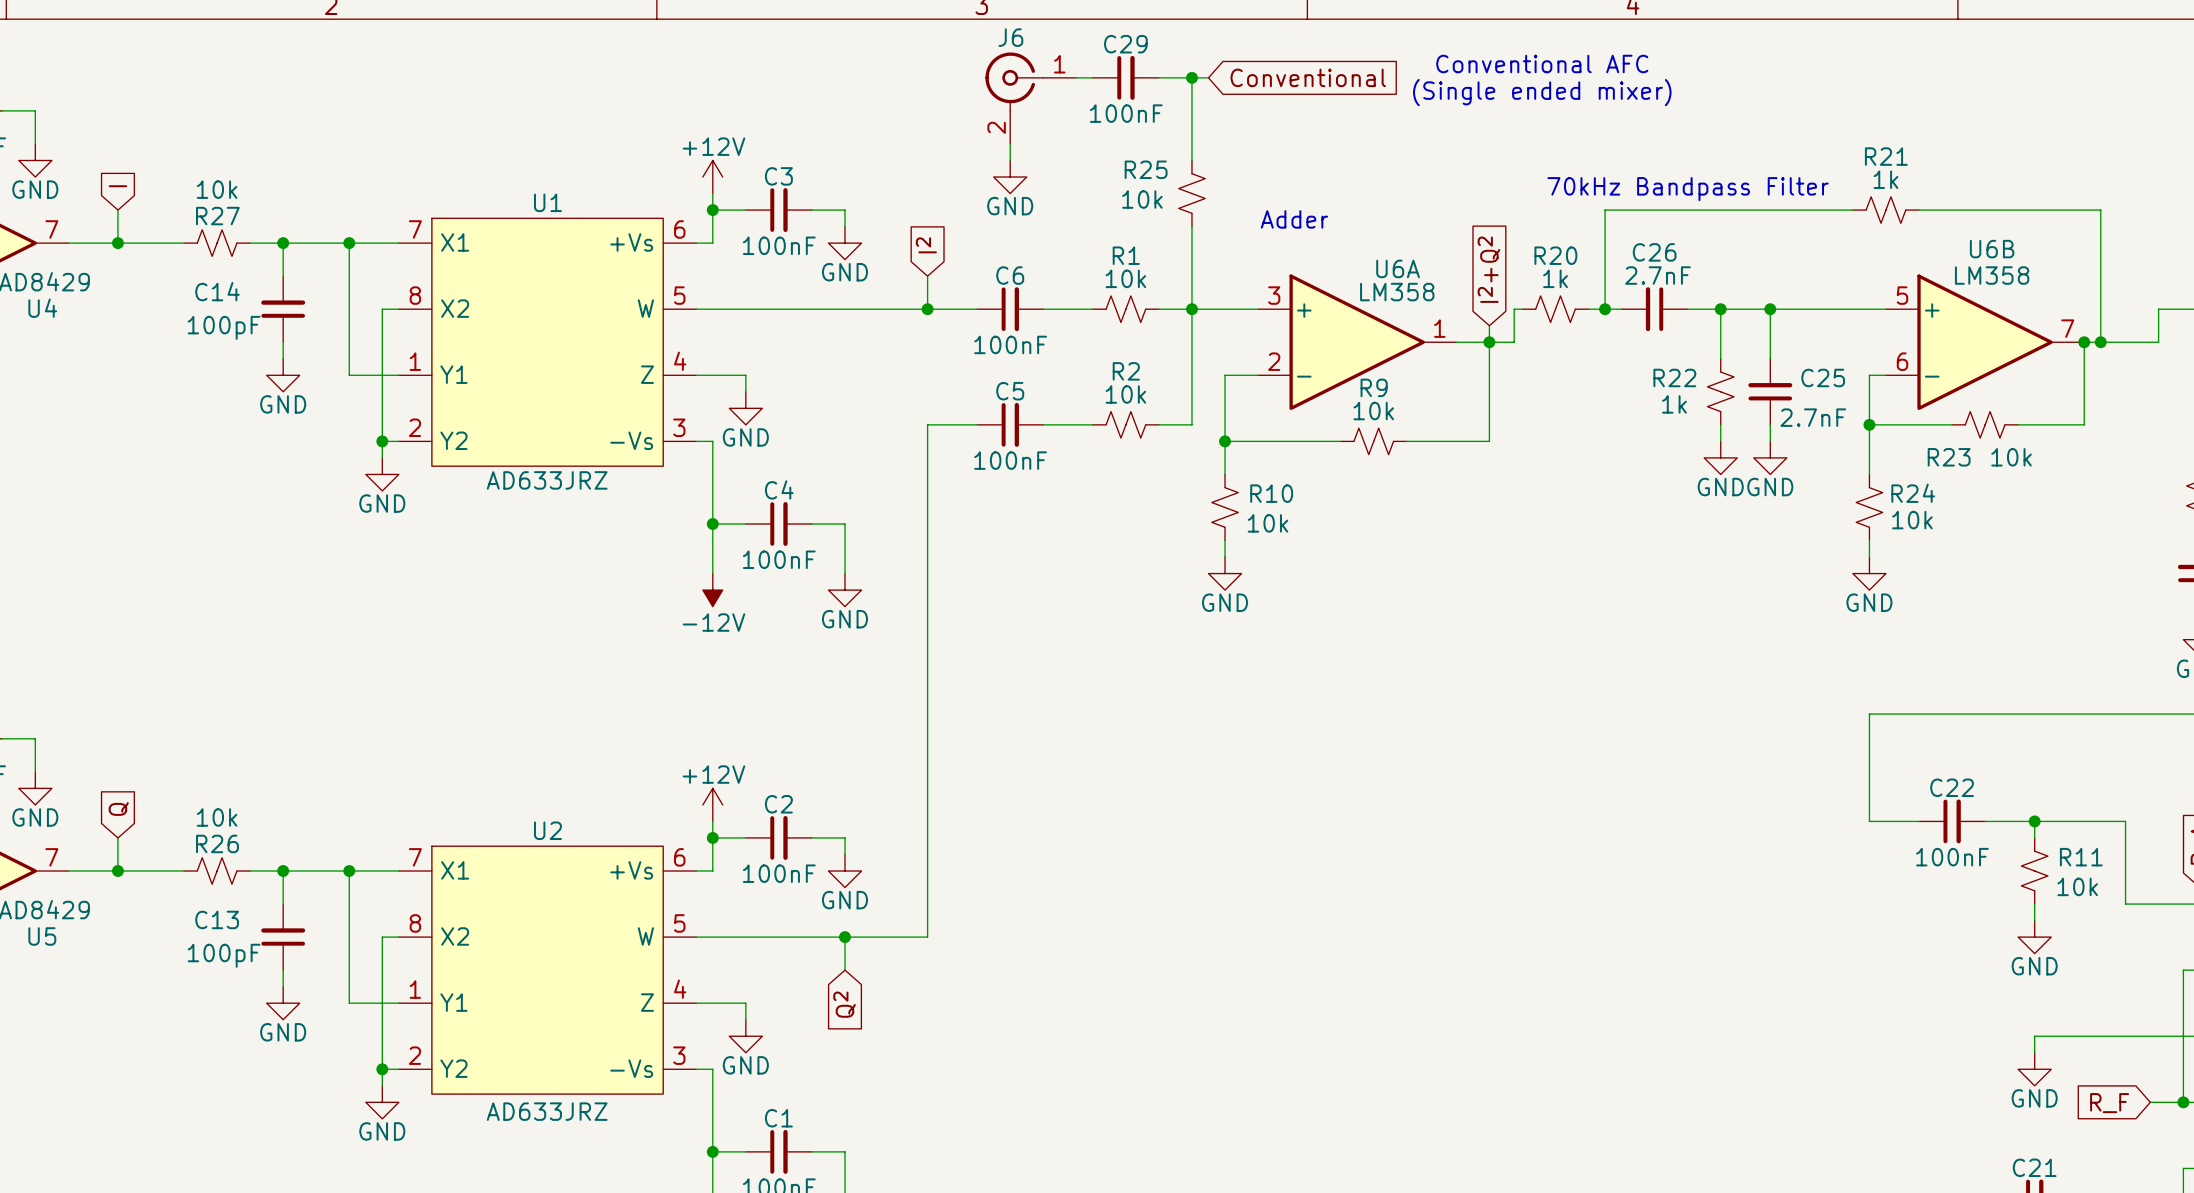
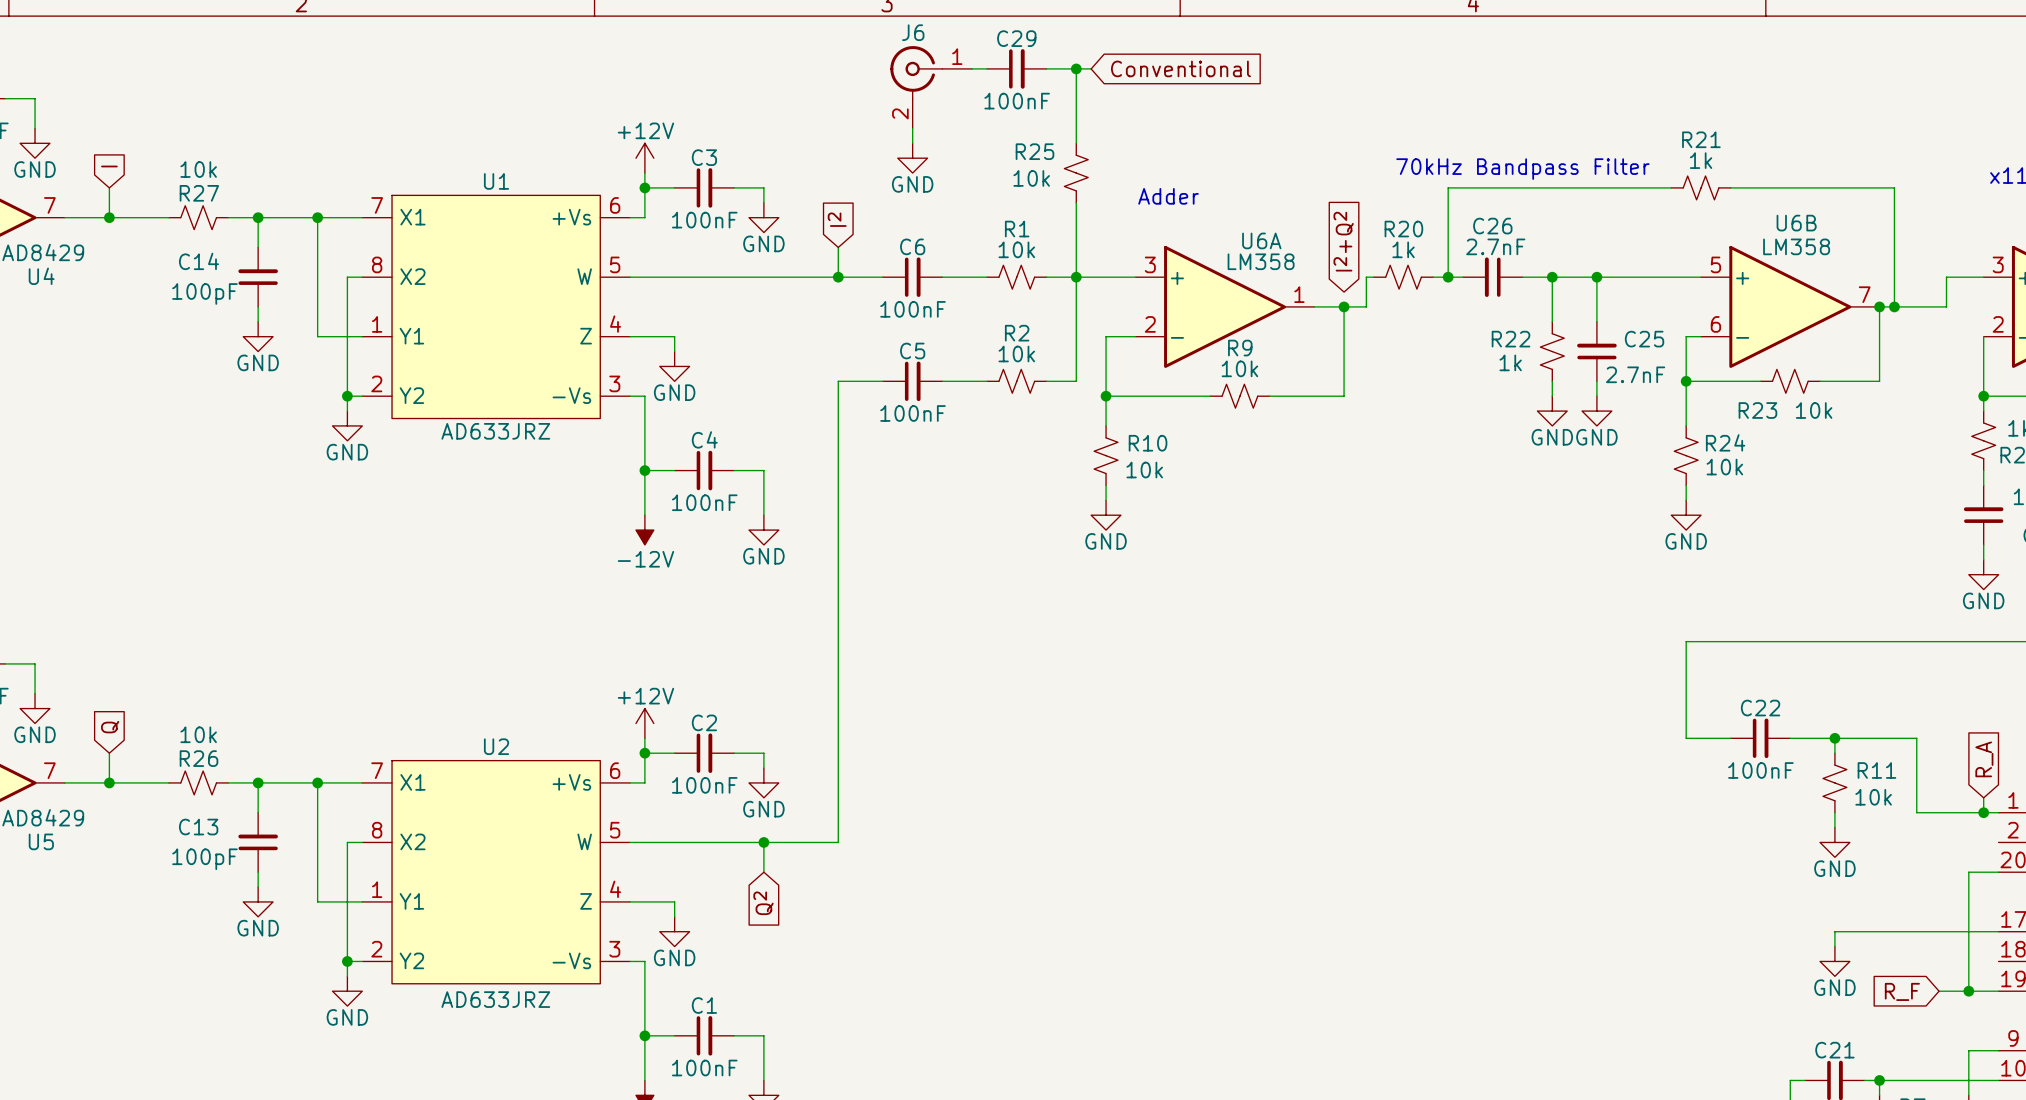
text: Conventional AFC (1542, 64) -> none
text: (Single ended mixer) (1542, 92) -> none
wire: (1489, 325) (1489, 342) -> none

